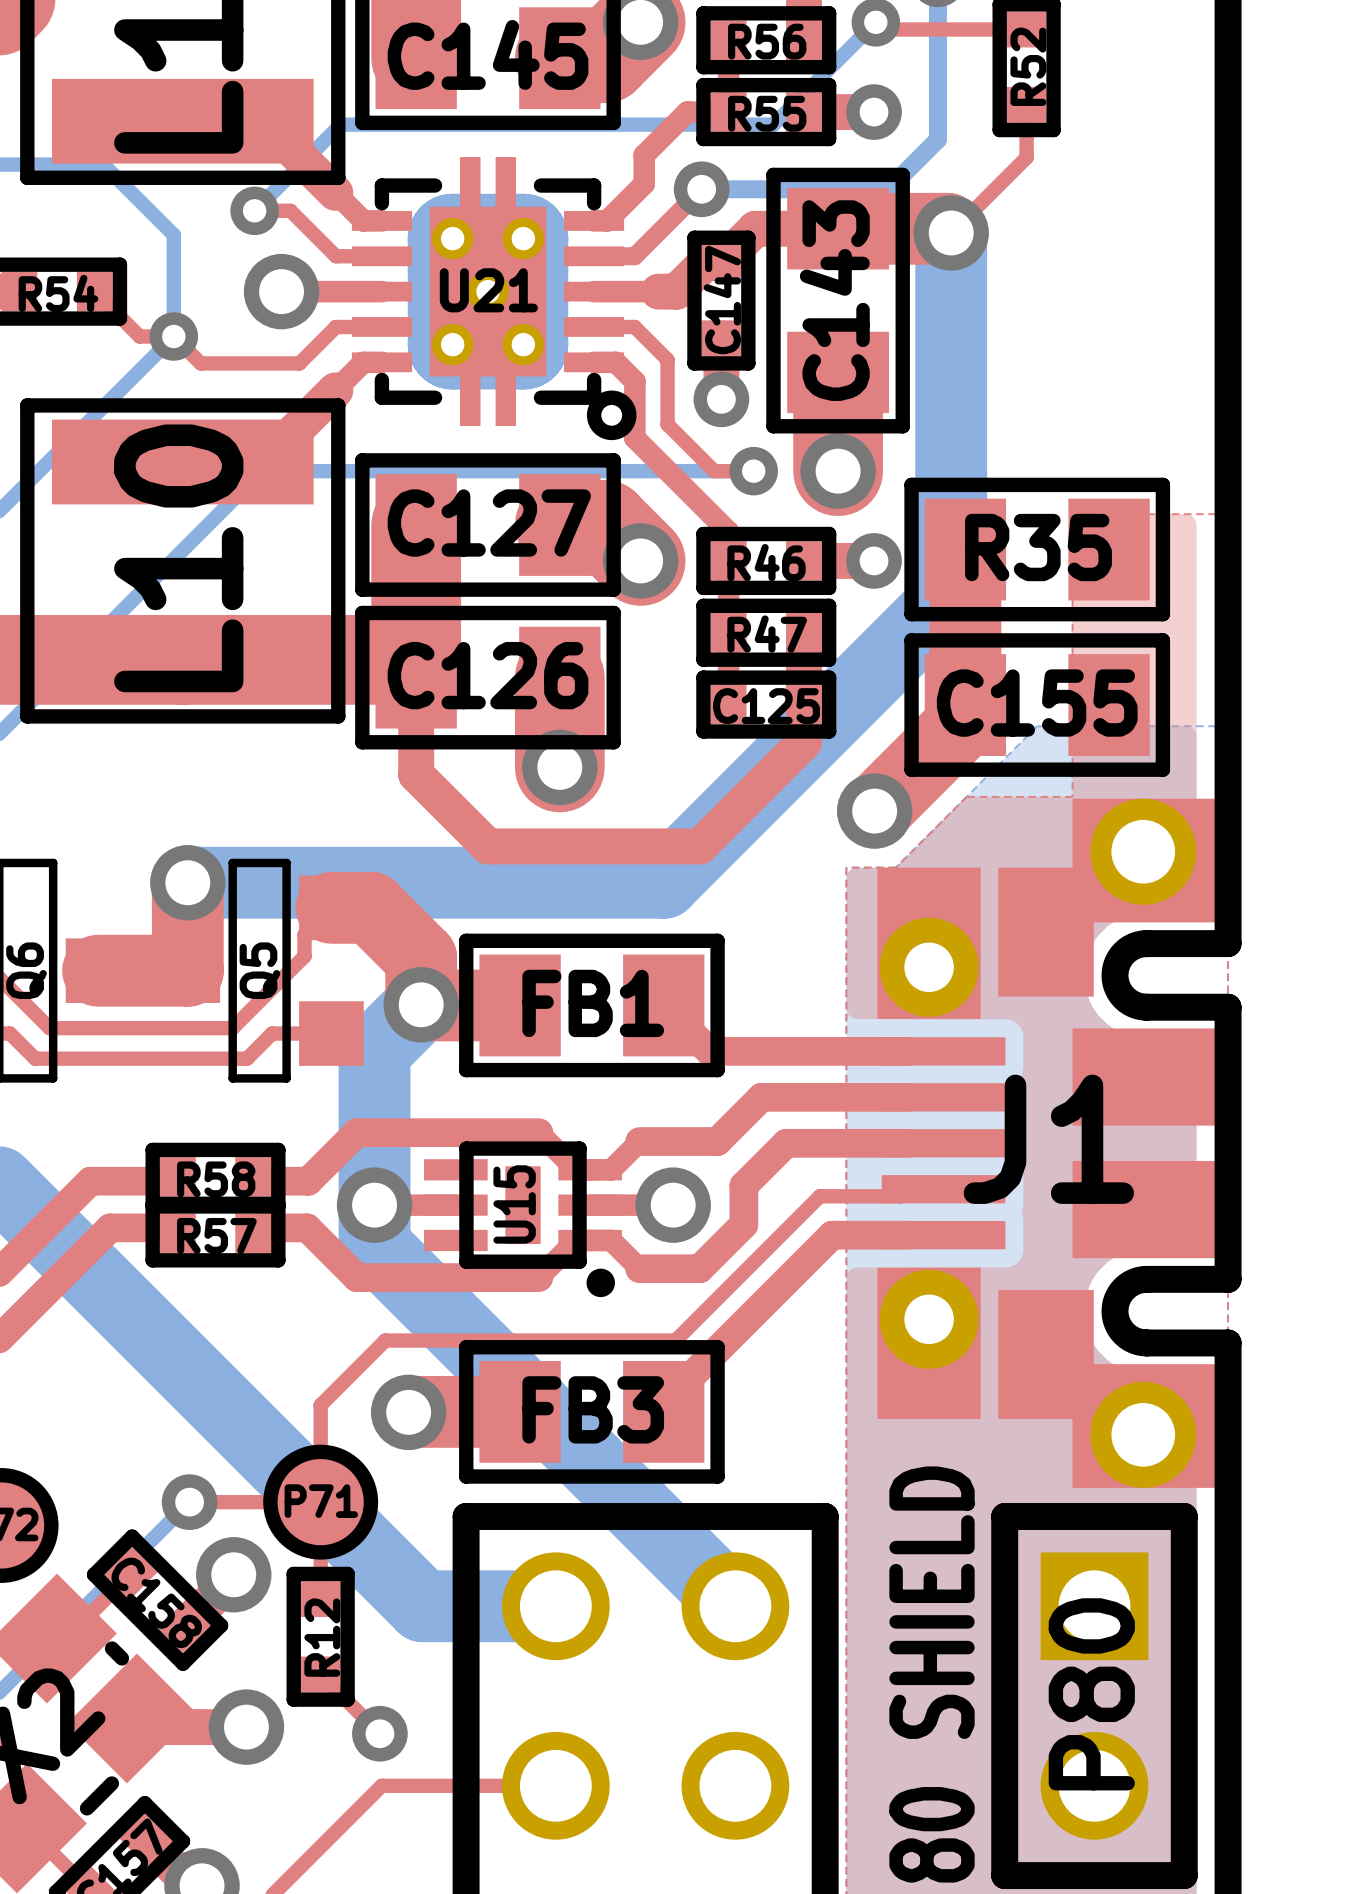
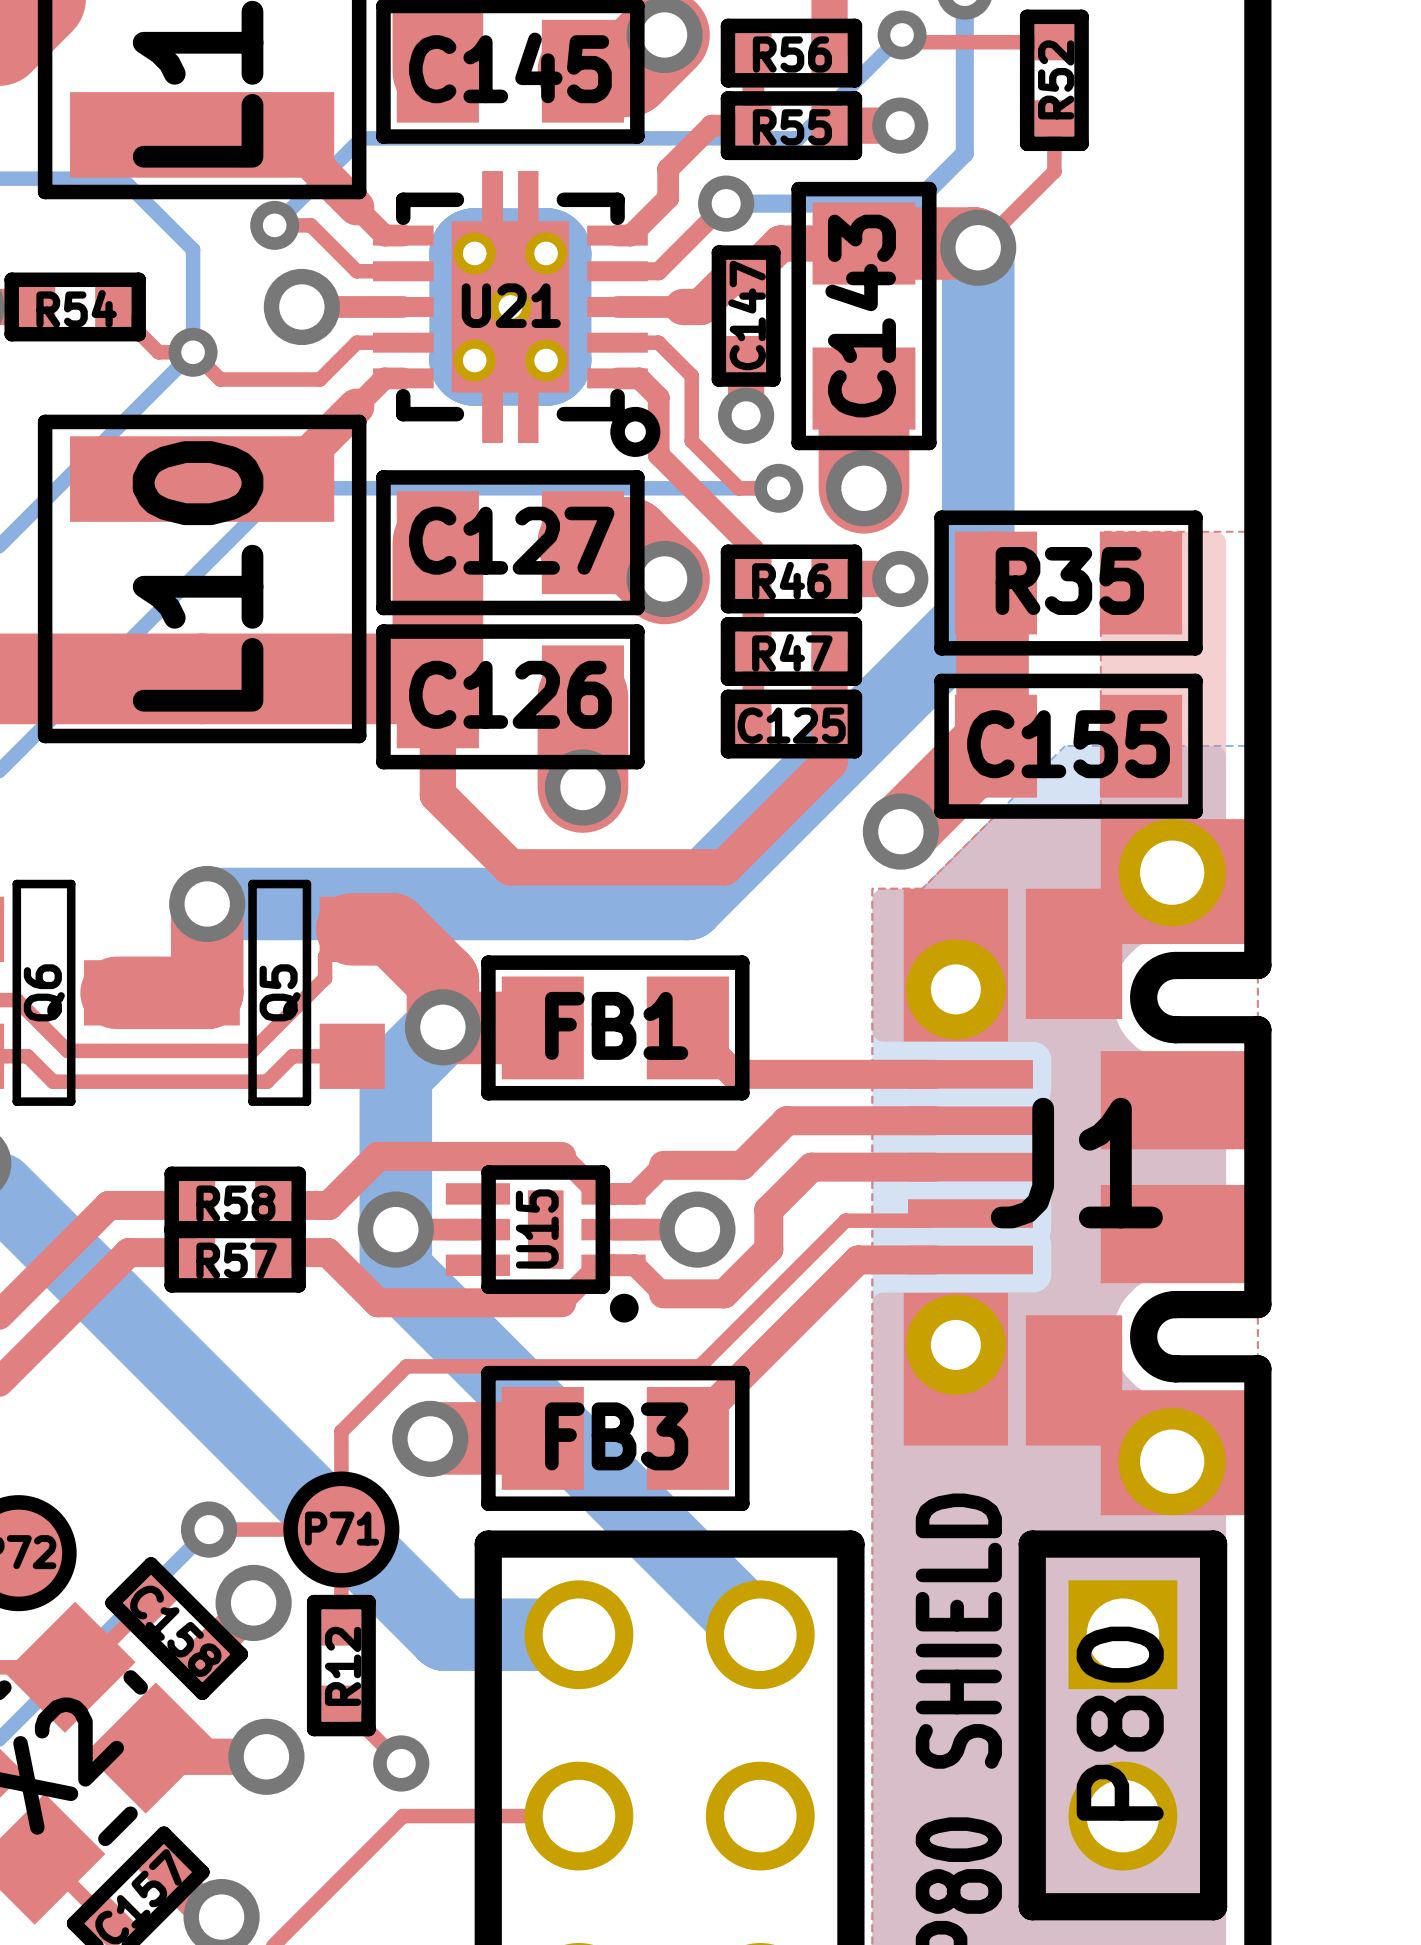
R35 position: (1037, 549) -> (1068, 583)
C155 position: (1037, 705) -> (1068, 746)

